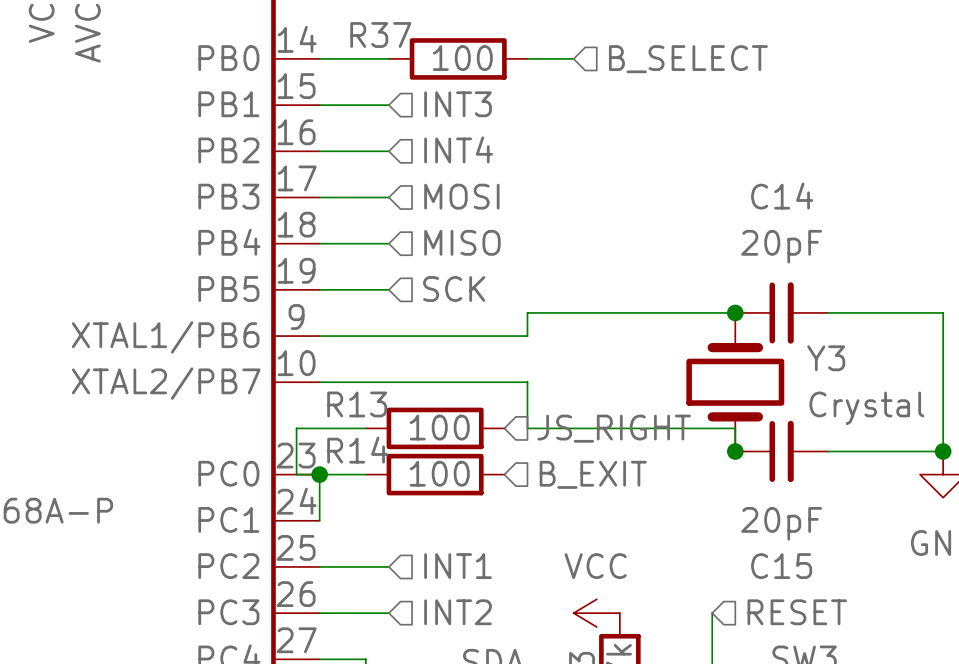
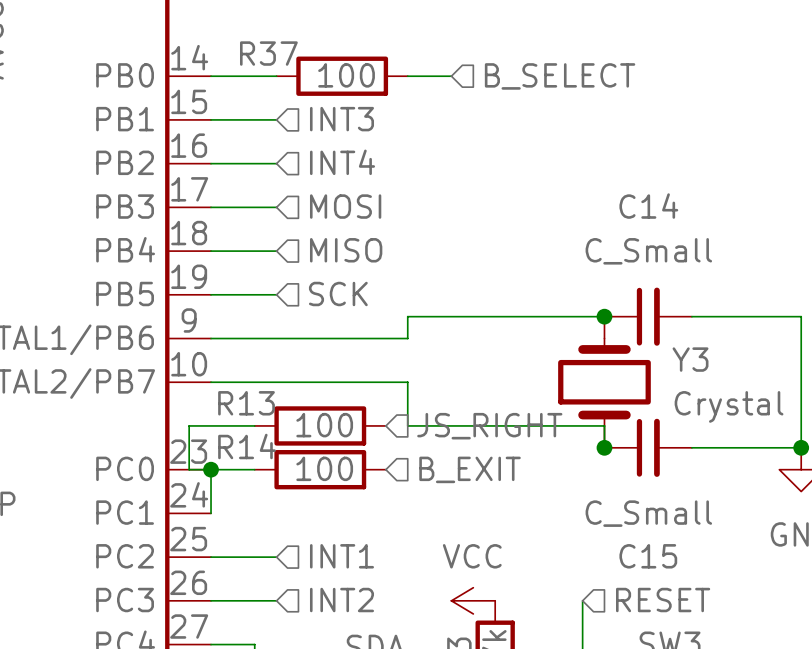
C14 value: 20pF (781, 246) -> C_Small (648, 251)
C15 value: 20pF (781, 523) -> C_Small (648, 513)

